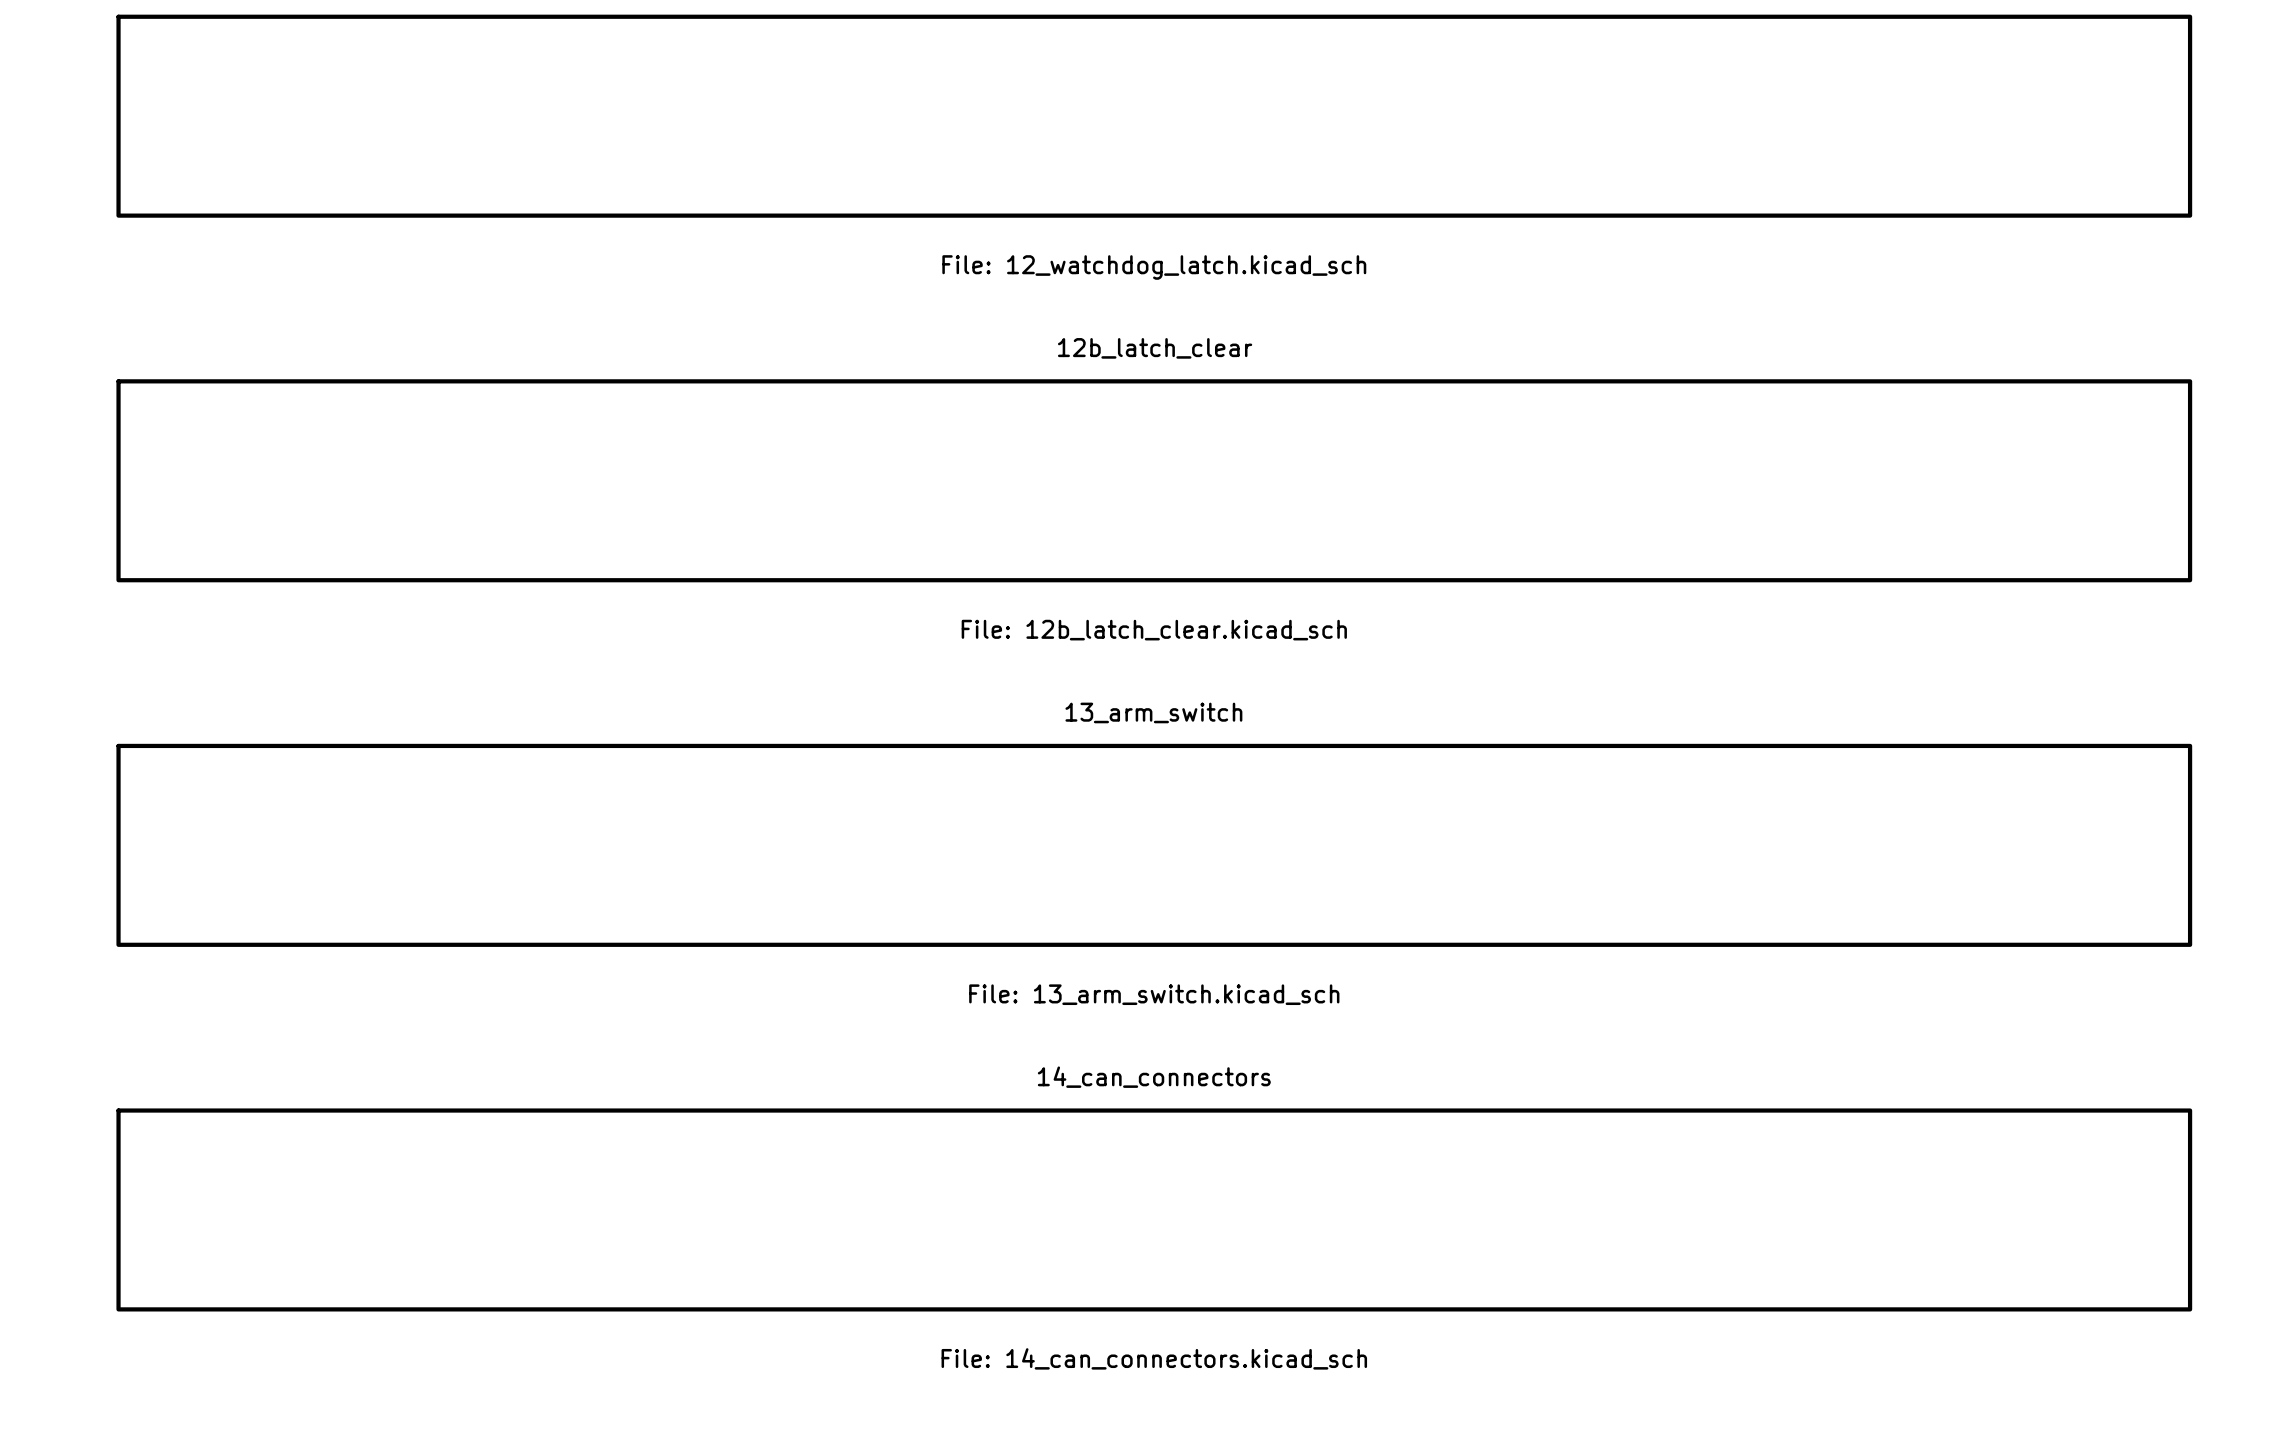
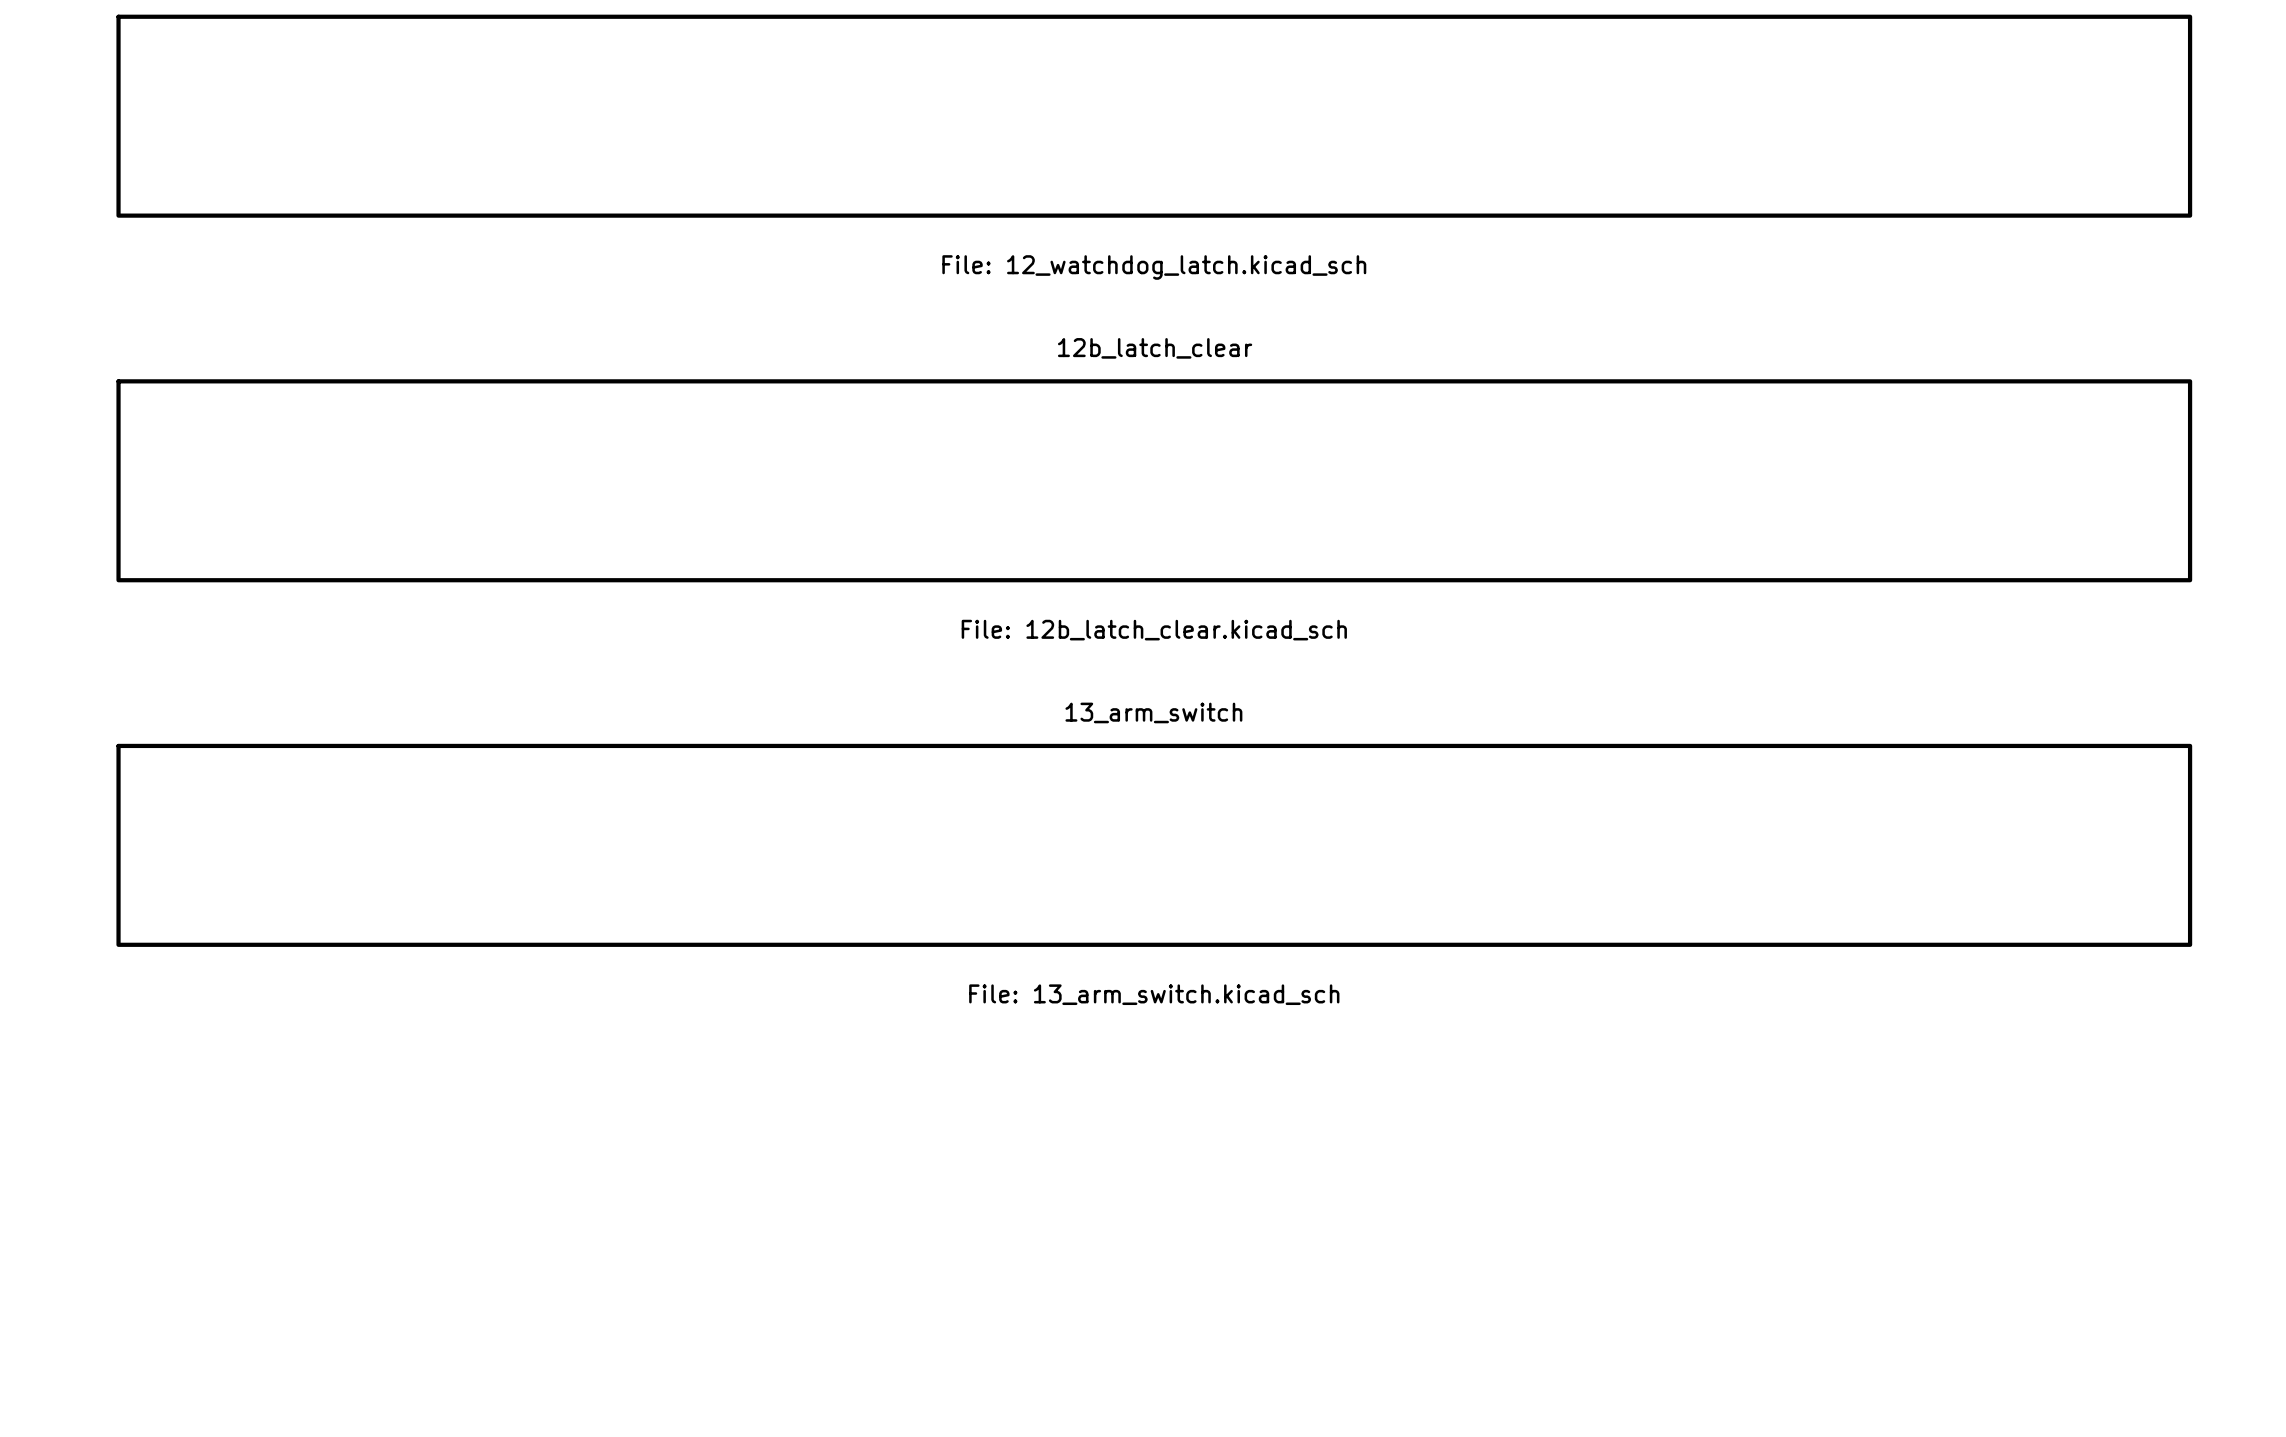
sheet 14_can_connectors: File: 14_can_connectors.kicad_sch (1154, 1209) -> none

